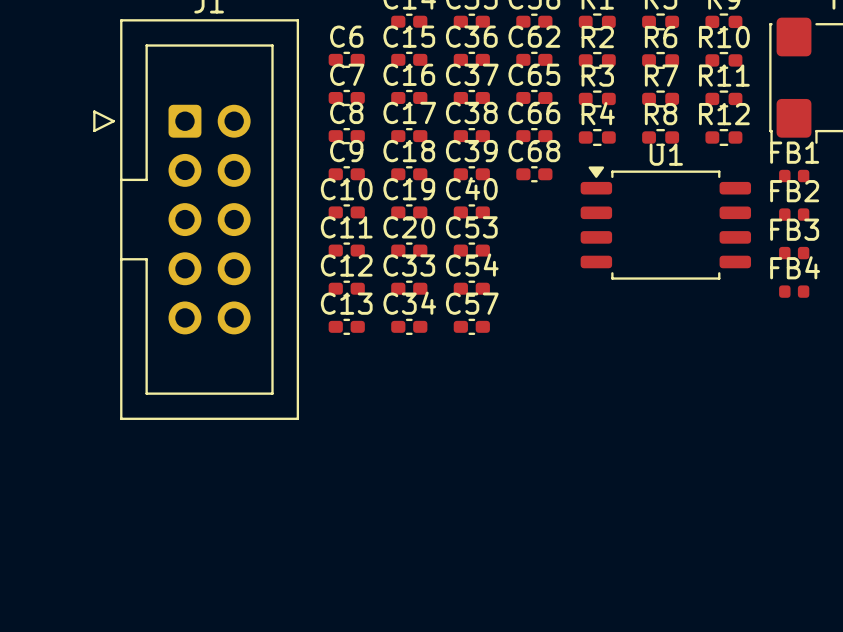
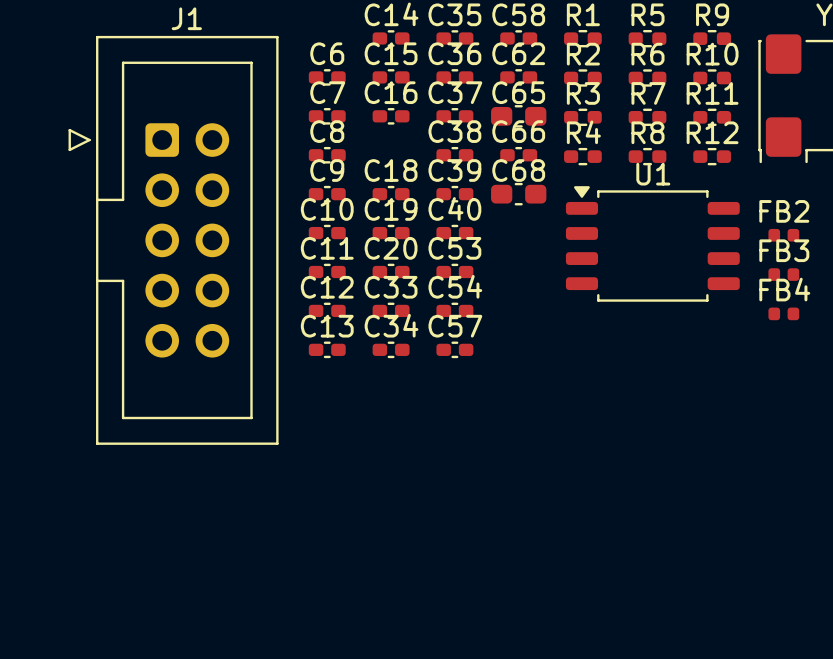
C65 footprint: [516, 89, 553, 107] -> [491, 105, 547, 128]
C17: (409, 136) -> none
C68 footprint: [516, 166, 553, 183] -> [491, 182, 547, 206]
FB1: (794, 176) -> none

